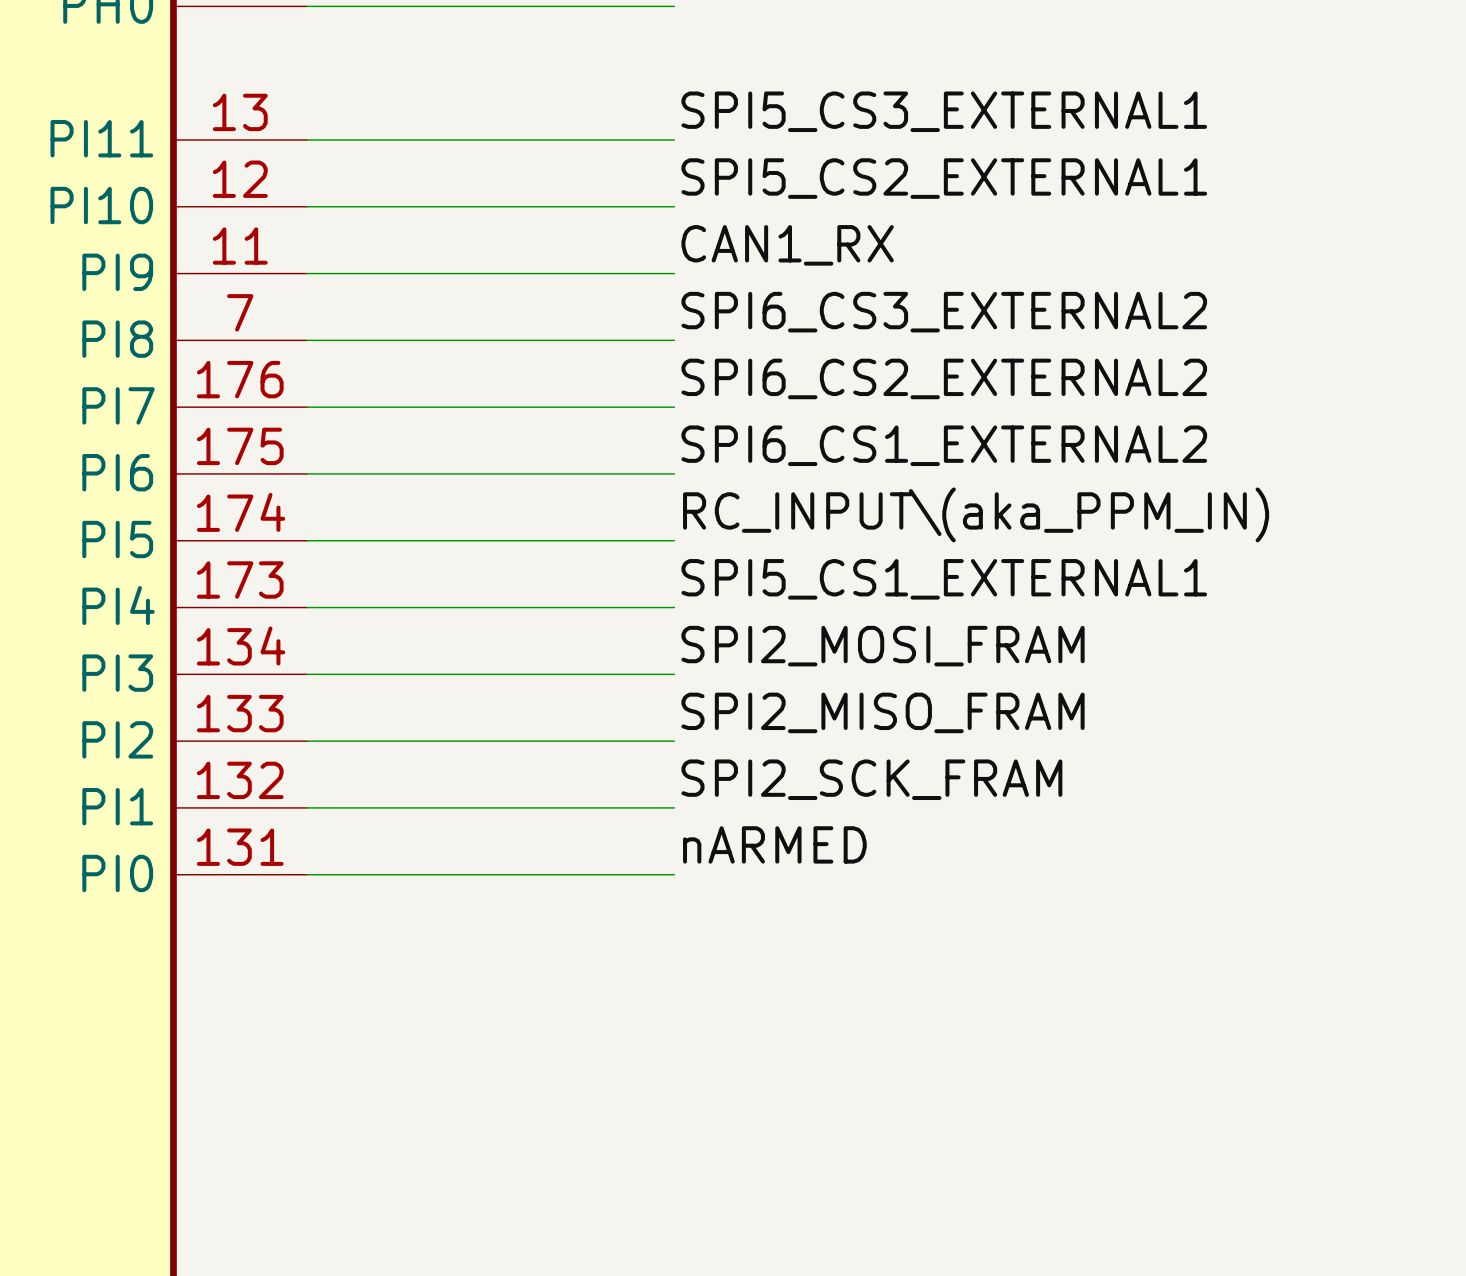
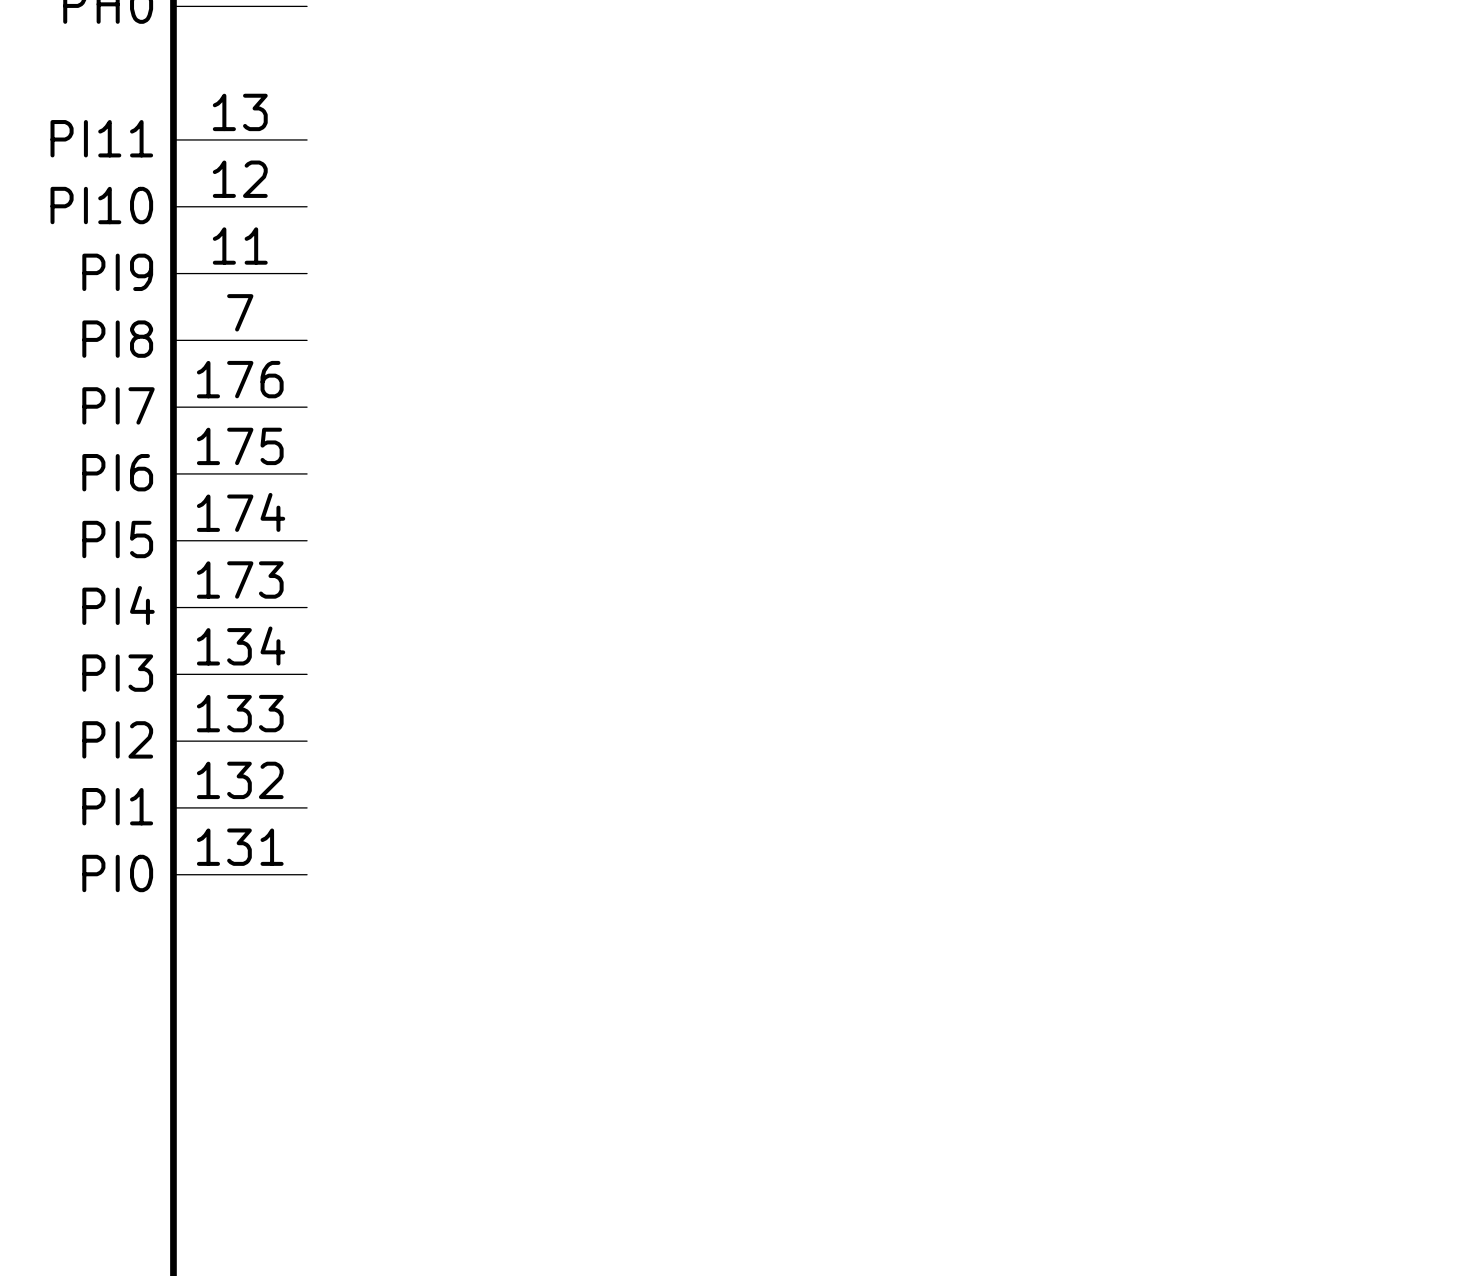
wire: (307, 6) (674, 6) -> none
label: SPI5_CS3_EXTERNAL1 (944, 111) -> none
wire: (307, 139) (674, 139) -> none
label: SPI5_CS2_EXTERNAL1 (944, 178) -> none
wire: (307, 206) (674, 206) -> none
label: CAN1_RX (787, 245) -> none
wire: (307, 273) (674, 273) -> none
label: SPI6_CS3_EXTERNAL2 (944, 312) -> none
wire: (307, 340) (674, 340) -> none
label: SPI6_CS2_EXTERNAL2 (944, 378) -> none
wire: (307, 407) (674, 407) -> none
label: SPI6_CS1_EXTERNAL2 (944, 445) -> none
wire: (307, 473) (674, 473) -> none
label: RC_INPUT\(aka_PPM_IN) (976, 514) -> none
wire: (307, 540) (674, 540) -> none
label: SPI5_CS1_EXTERNAL1 (944, 579) -> none
wire: (307, 607) (674, 607) -> none
label: SPI2_MOSI_FRAM (883, 646) -> none
wire: (307, 674) (674, 674) -> none
label: SPI2_MISO_FRAM (883, 712) -> none
wire: (307, 741) (674, 741) -> none
label: SPI2_SCK_FRAM (871, 779) -> none
wire: (307, 807) (674, 807) -> none
label: nARMED (774, 844) -> none
wire: (307, 874) (674, 874) -> none

